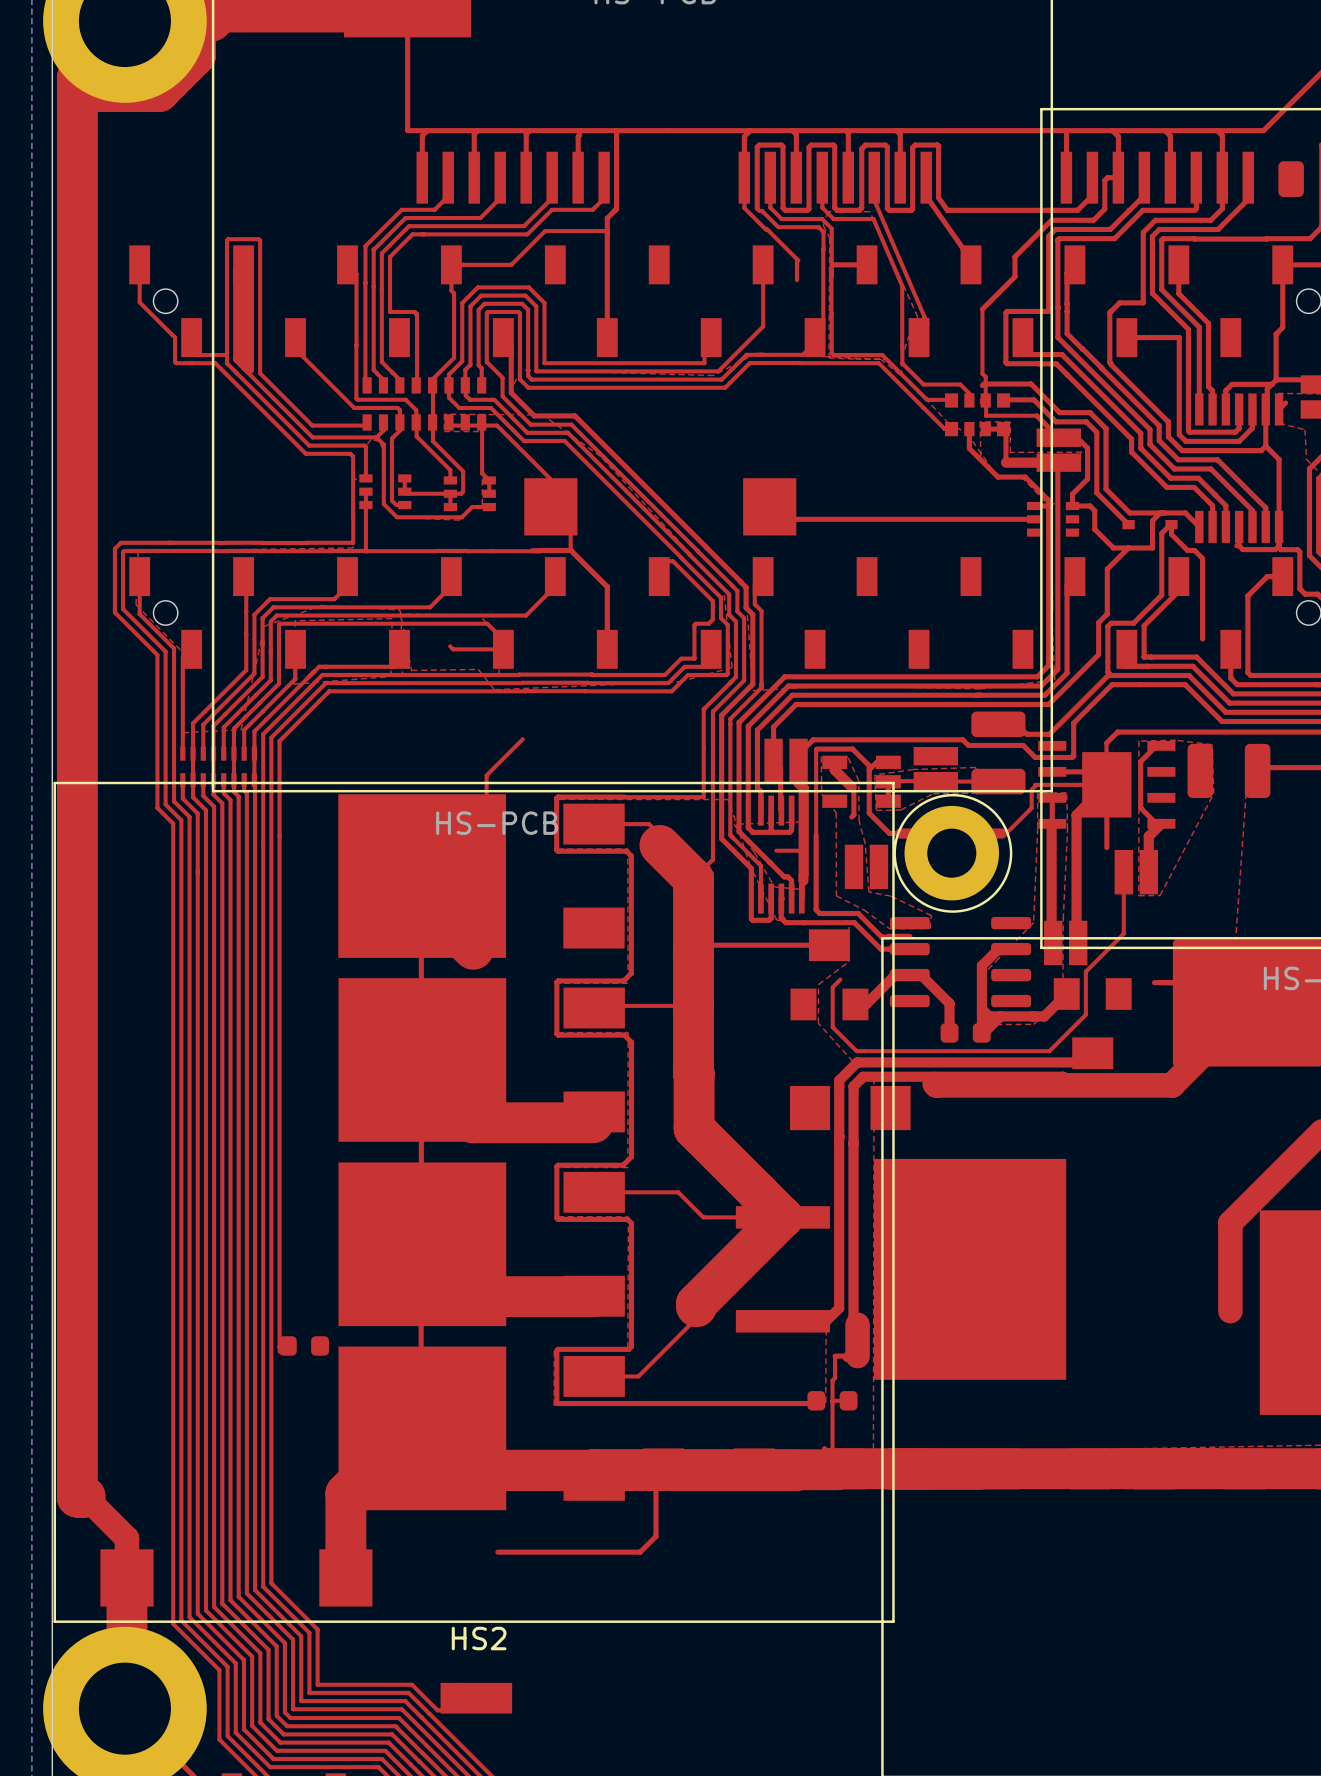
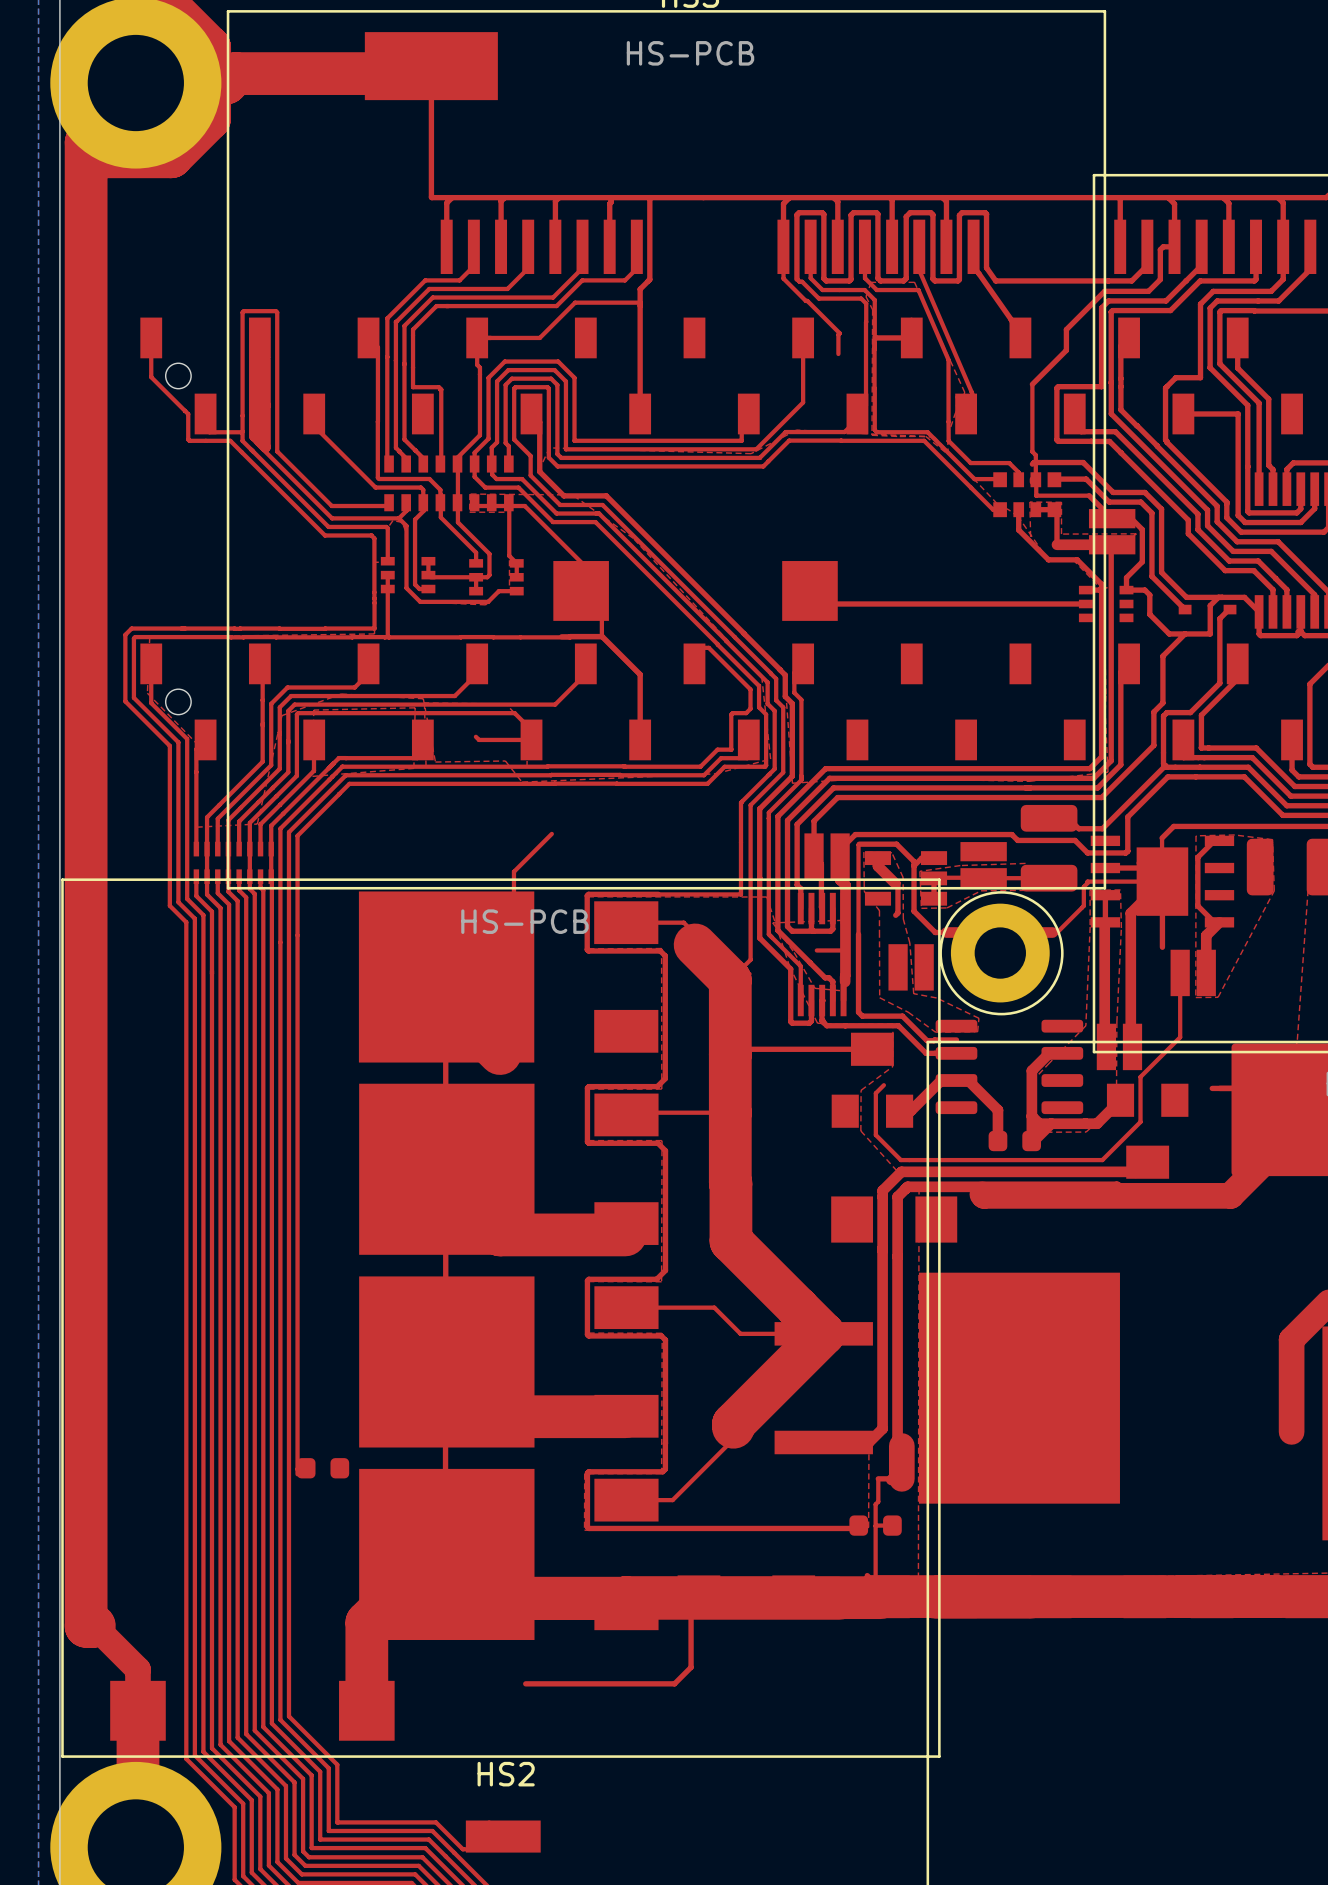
top track: (1171, 524) (1171, 534) (1187, 550) (1194, 550) (1202, 558) (1202, 638) -> none
top track: none -> (1259, 611) (1260, 635) (1296, 635) (1298, 631)

